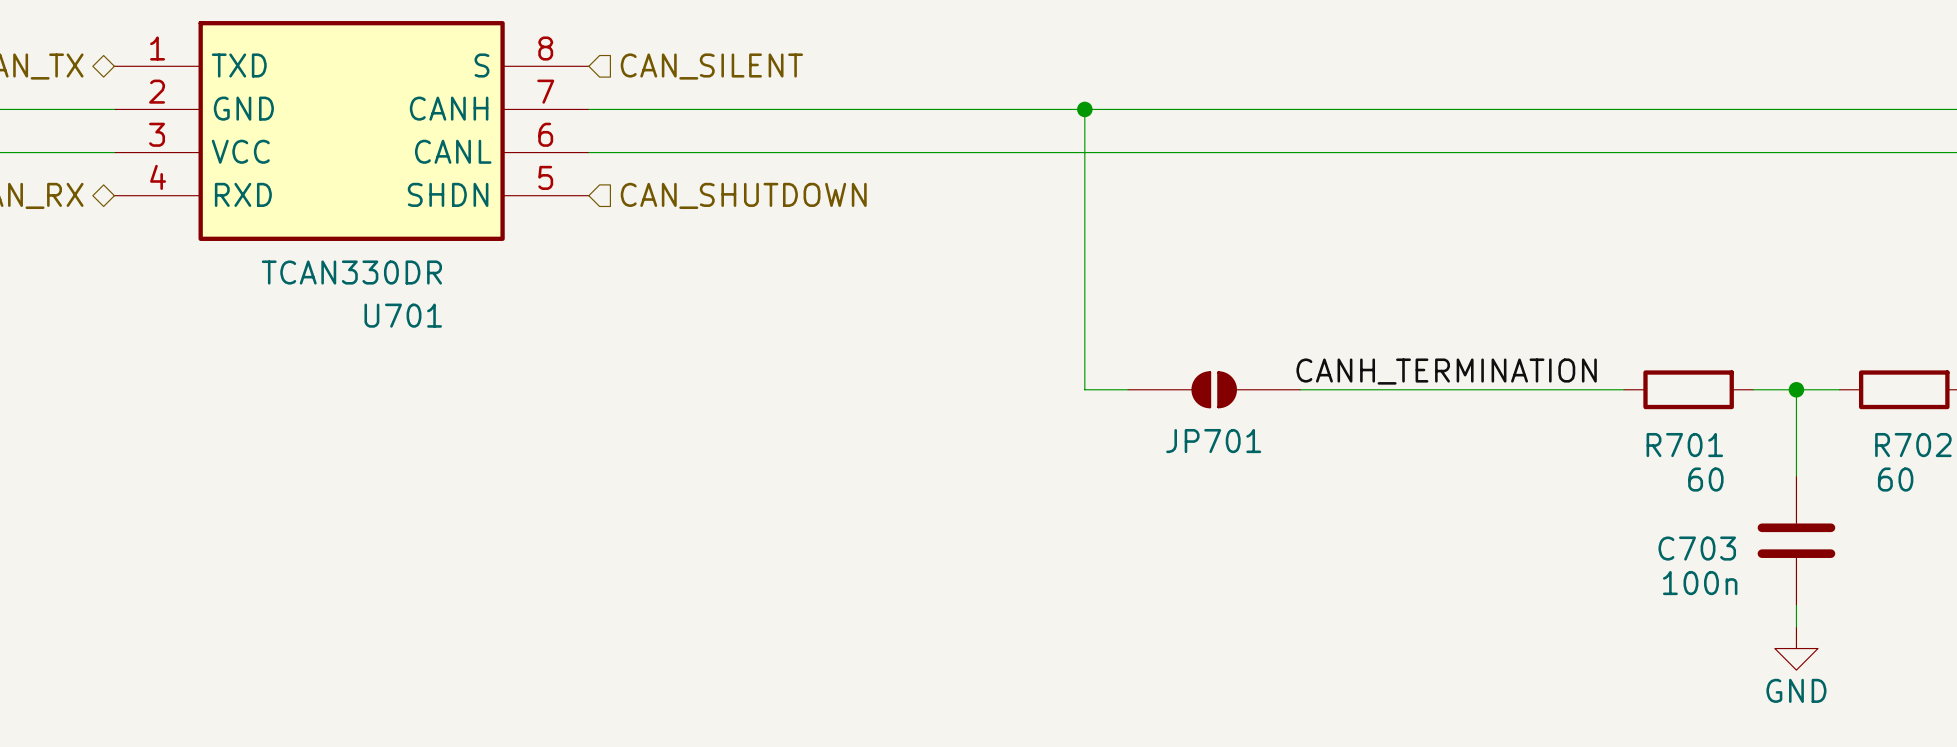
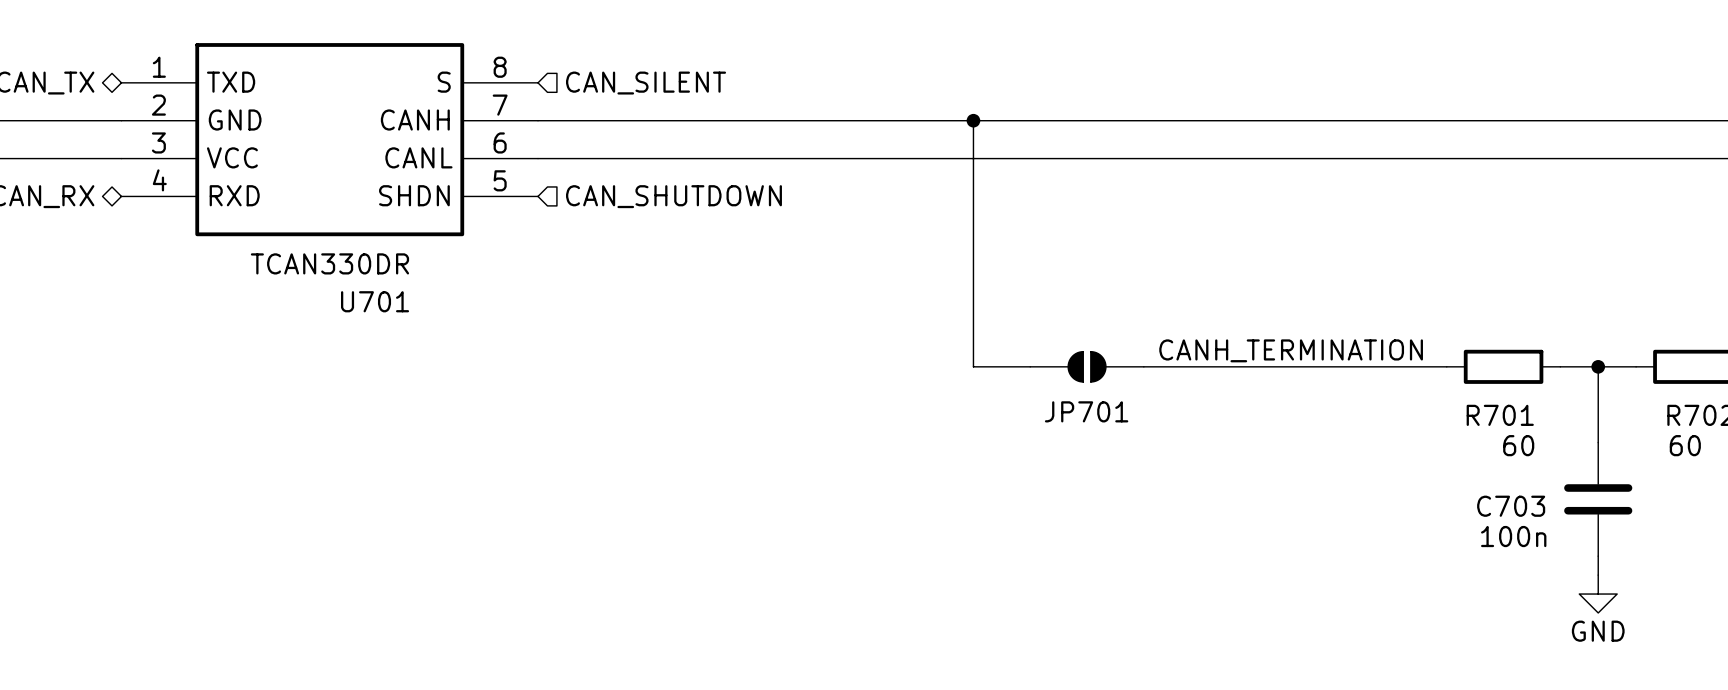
JP701 symbol: [1127, 371, 1301, 409] -> [1030, 351, 1144, 382]

